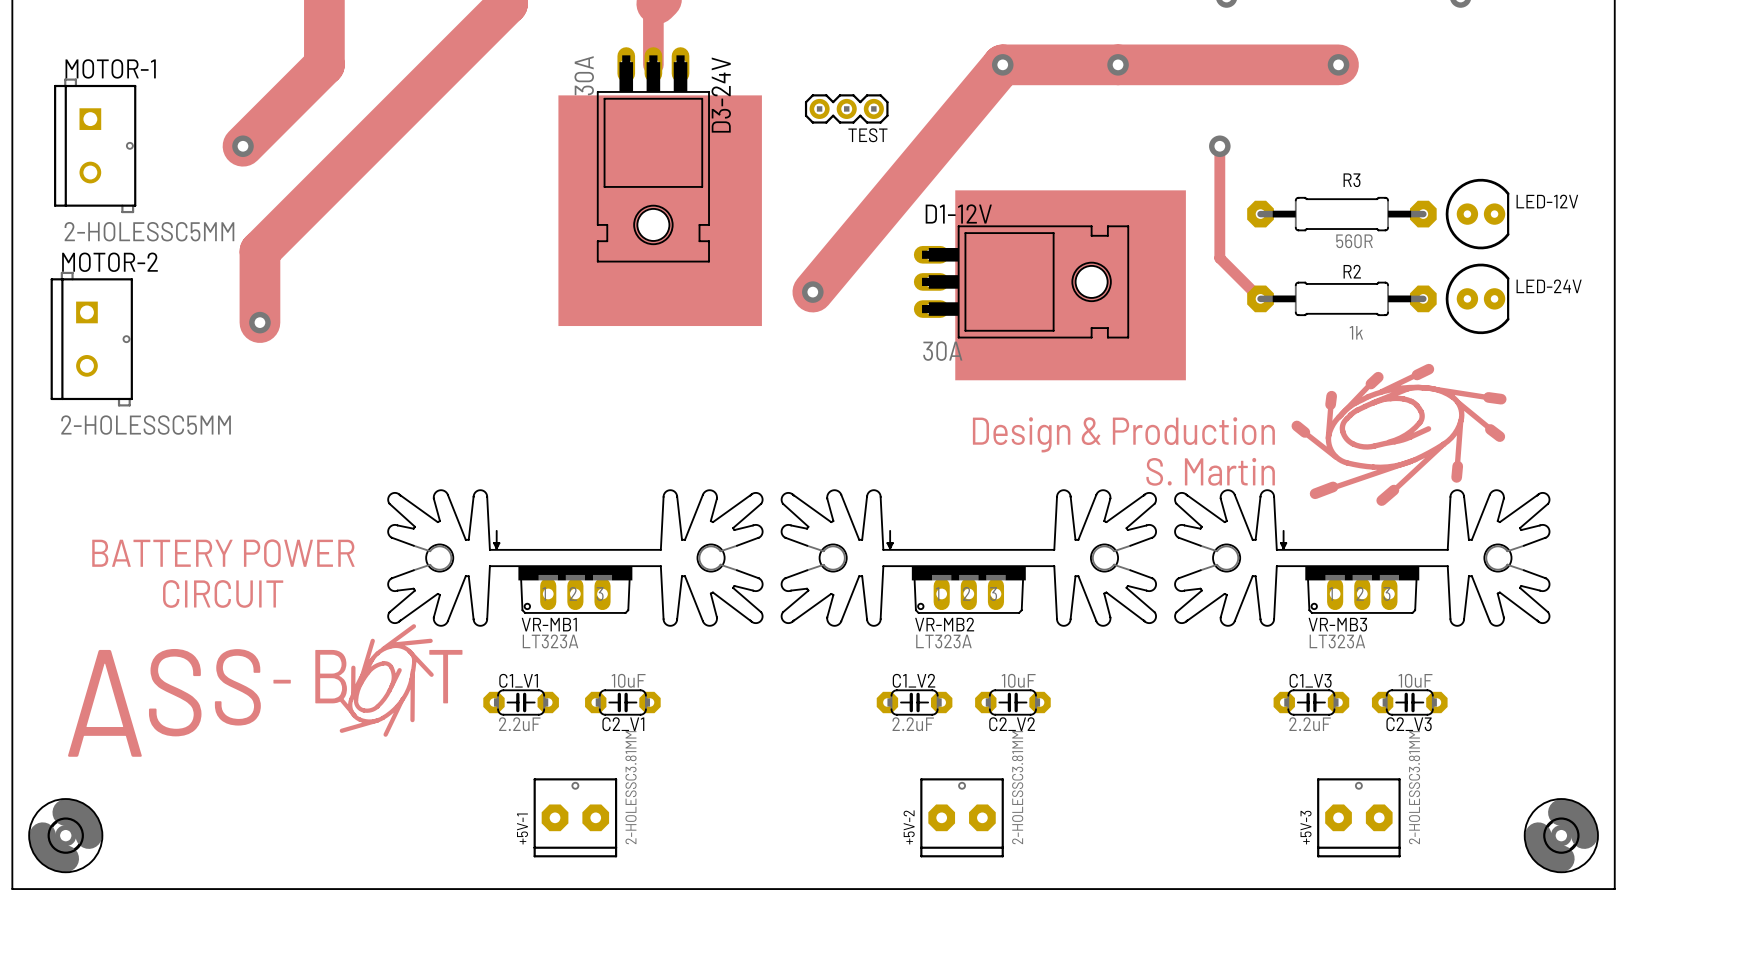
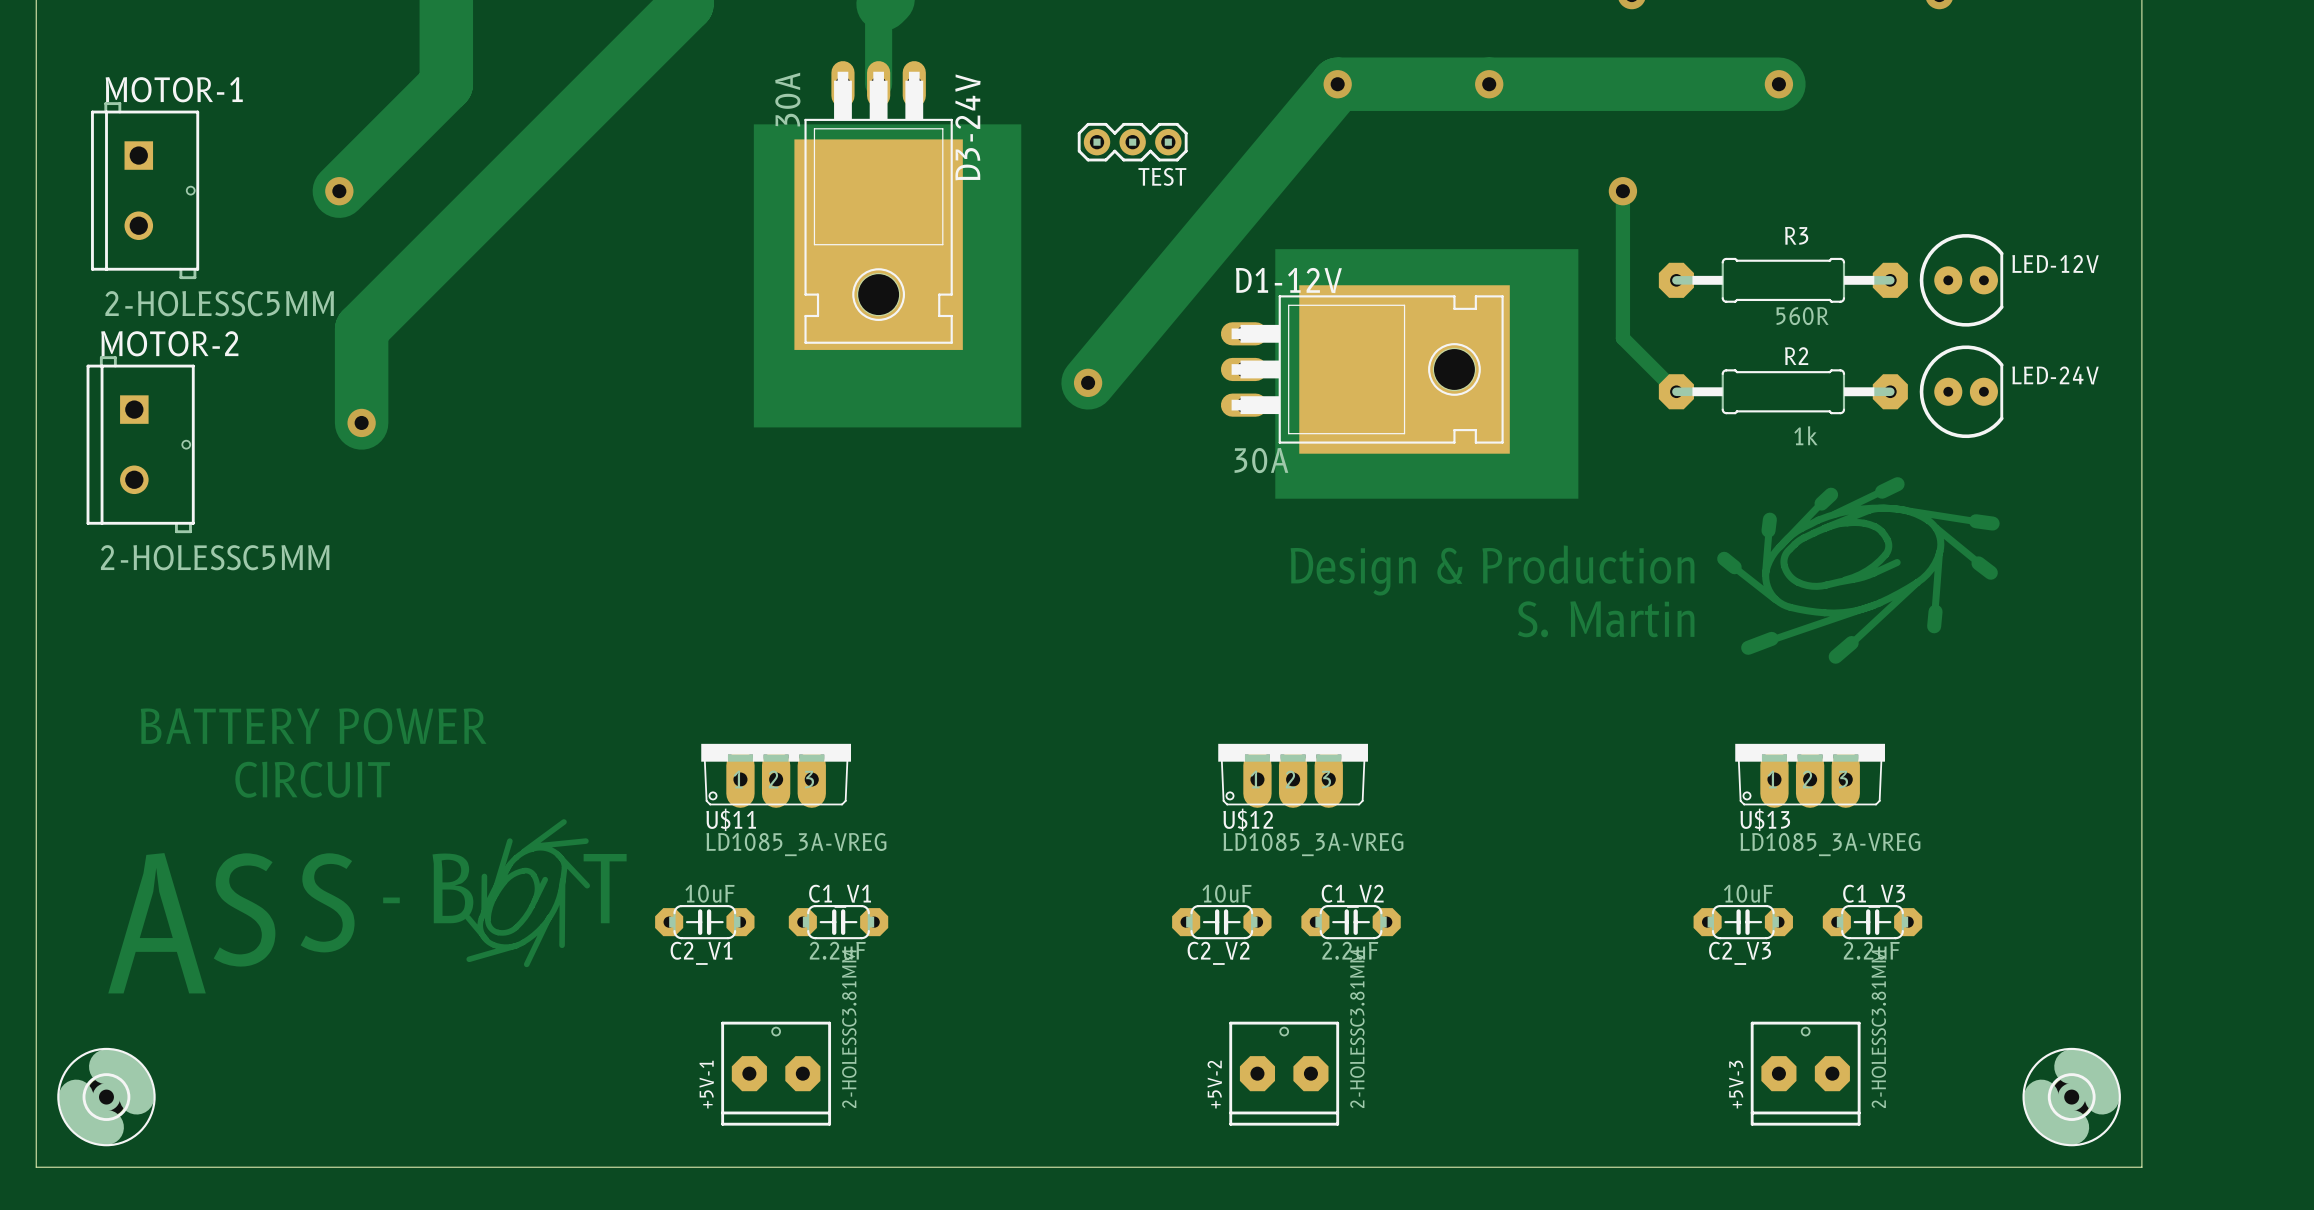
VR-MB1: LT323A (575, 558) -> none
VR-MB2: LT323A (968, 558) -> none
VR-MB3: LT323A (1362, 558) -> none
U$11: none -> LD1085_3A-VREG (776, 775)
U$12: none -> LD1085_3A-VREG (1293, 775)
U$13: none -> LD1085_3A-VREG (1810, 775)
C1_V1 position: (521, 702) -> (838, 922)
C2_V1 position: (622, 702) -> (704, 922)
C1_V2 position: (914, 702) -> (1351, 922)
C2_V2 position: (1012, 702) -> (1221, 922)
C1_V3 position: (1311, 702) -> (1872, 922)
C2_V3 position: (1409, 702) -> (1743, 922)

